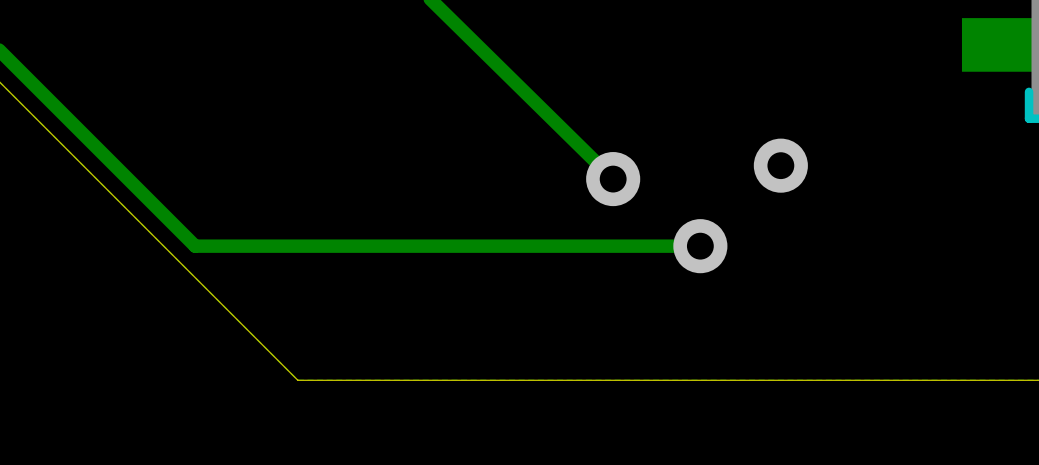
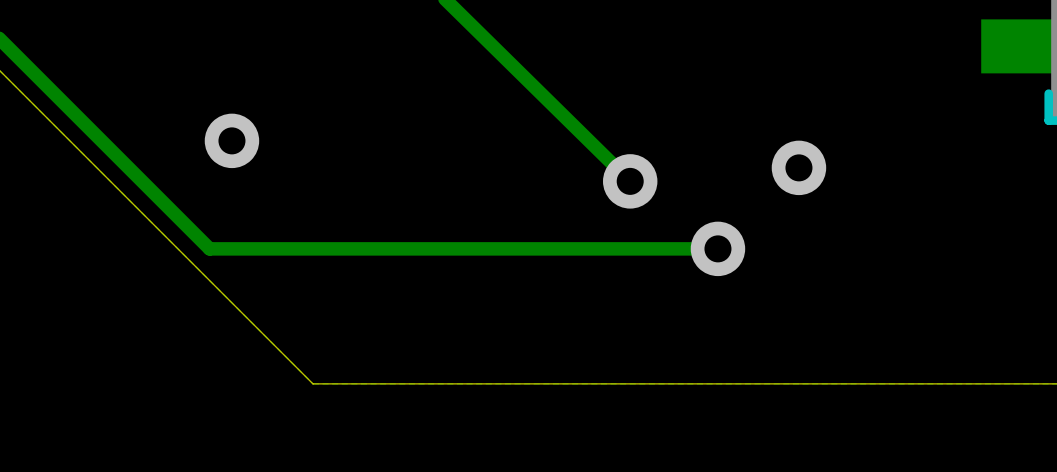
via: none -> (231, 140)

